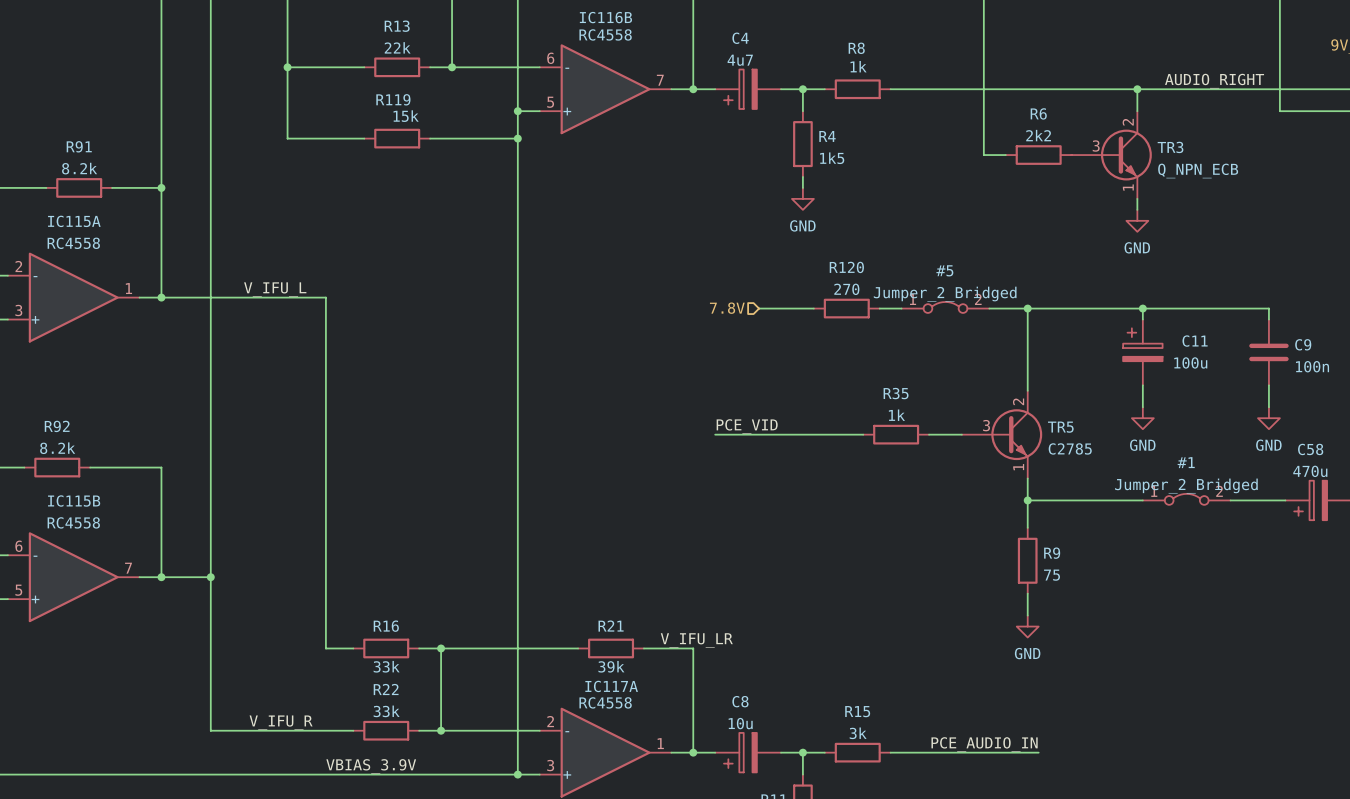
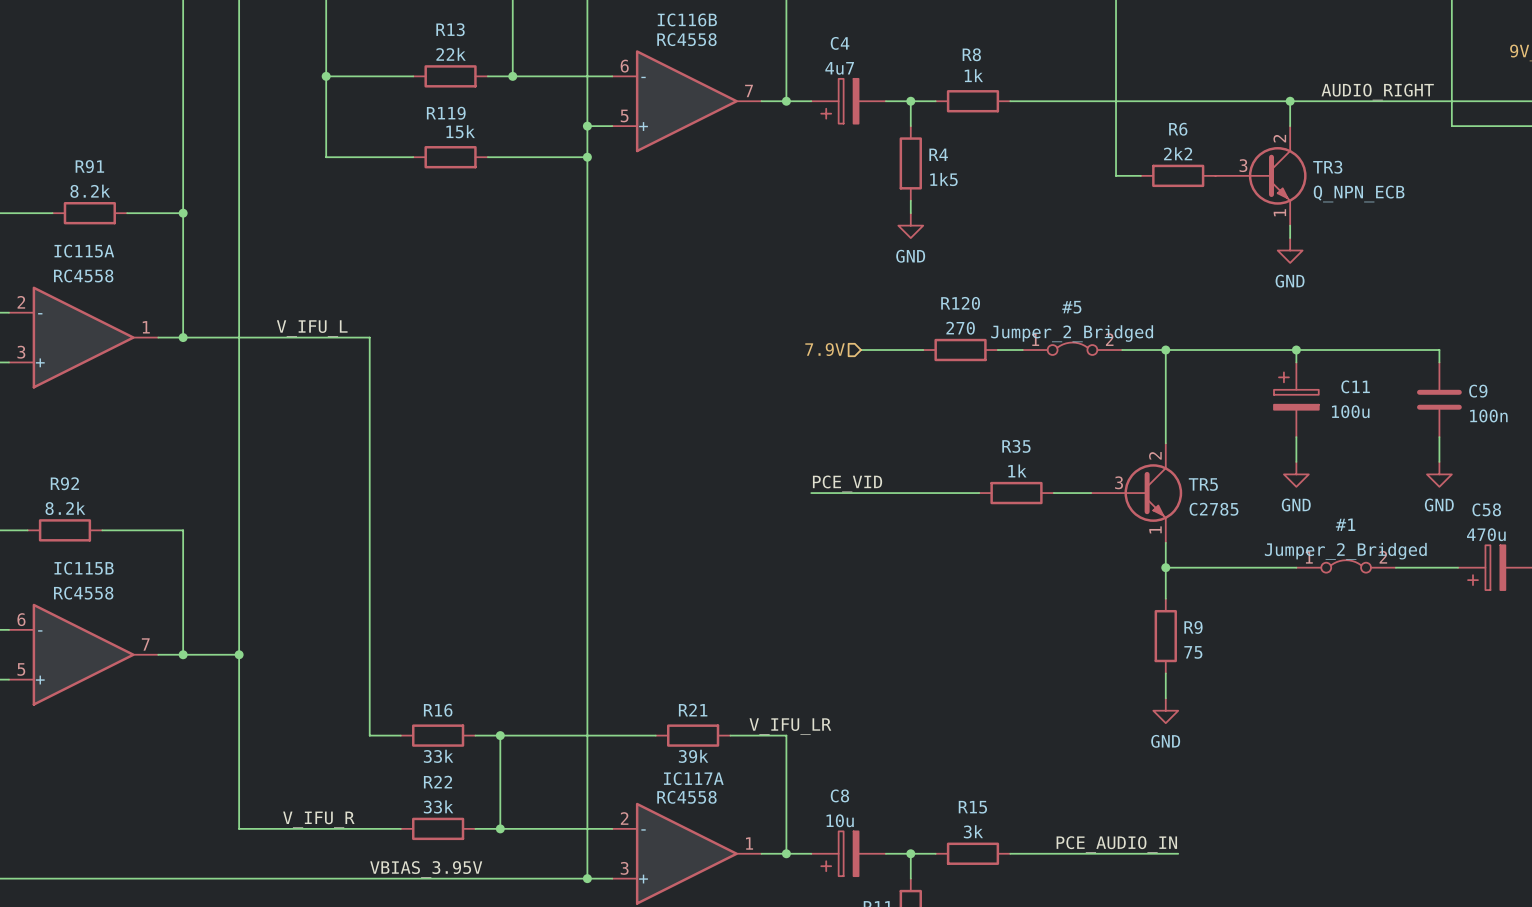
hierarchical label: 7.8V (727, 308) -> 7.9V (825, 349)
label: VBIAS_3.9V (371, 766) -> VBIAS_3.95V (426, 869)

